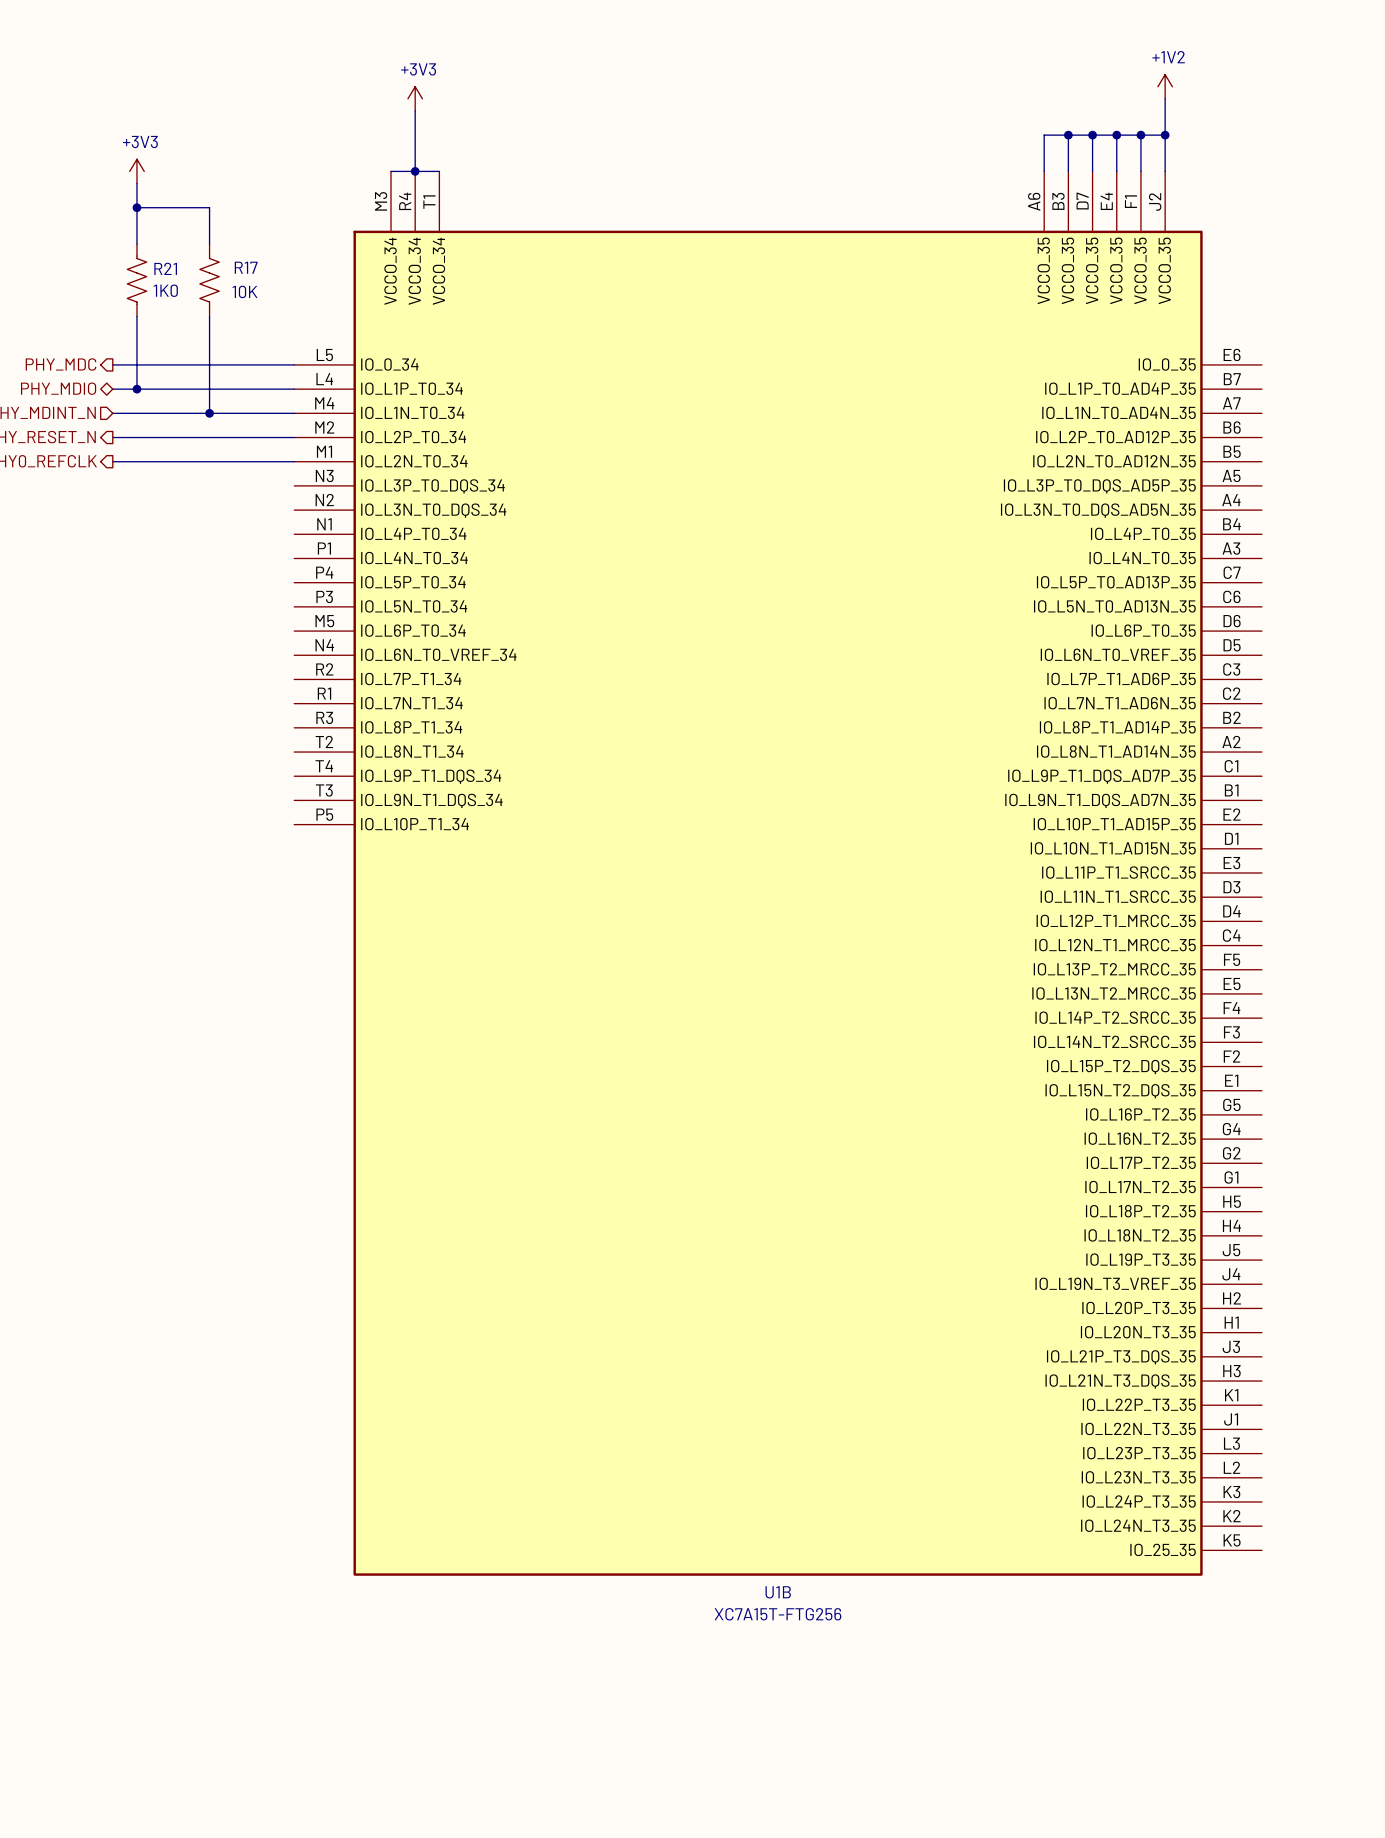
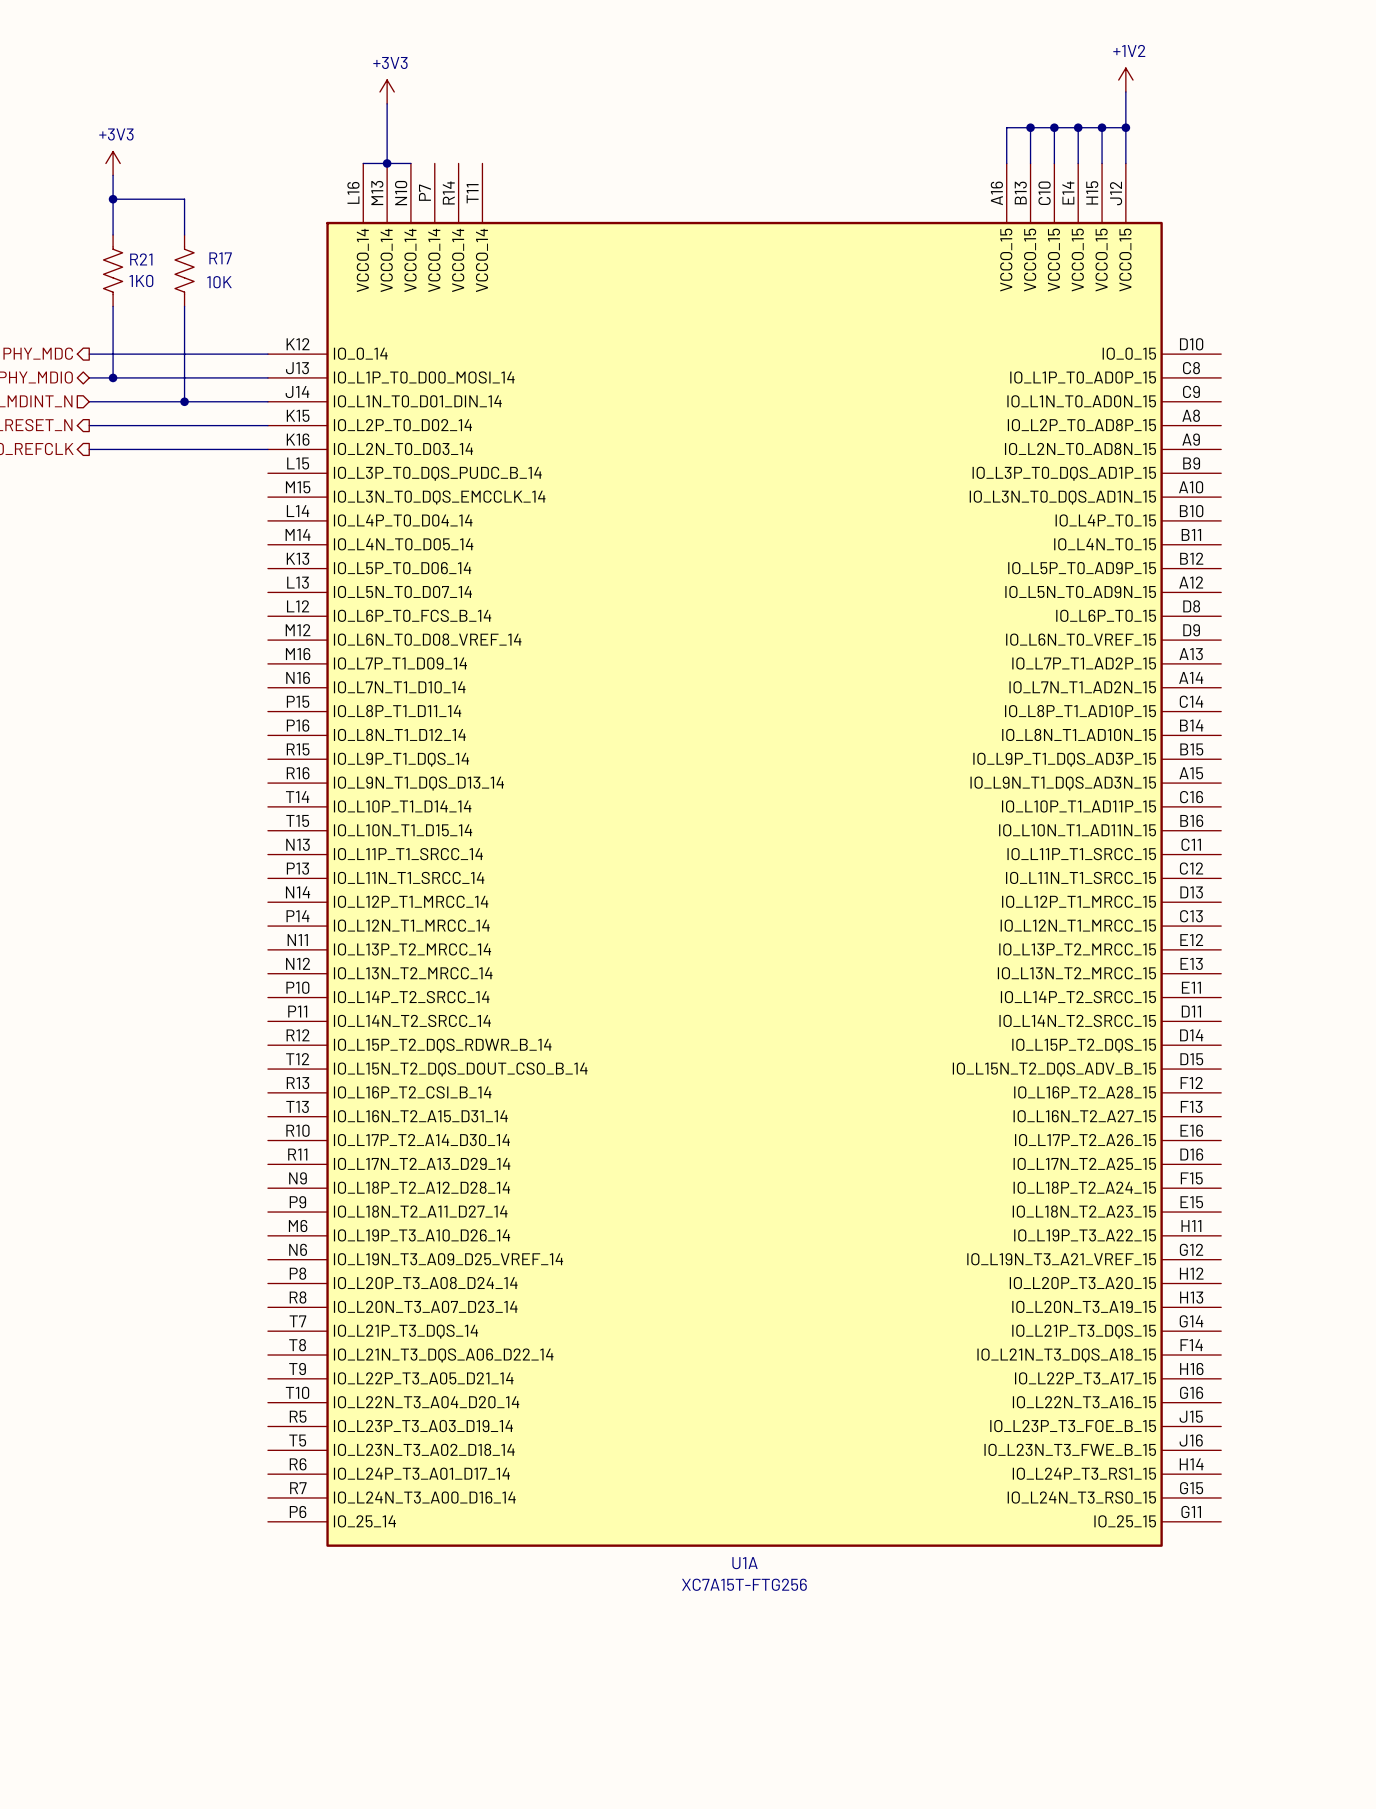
U1B: XC7A15T-FTG256 (778, 873) -> none
U1A: none -> XC7A15T-FTG256 (744, 855)

